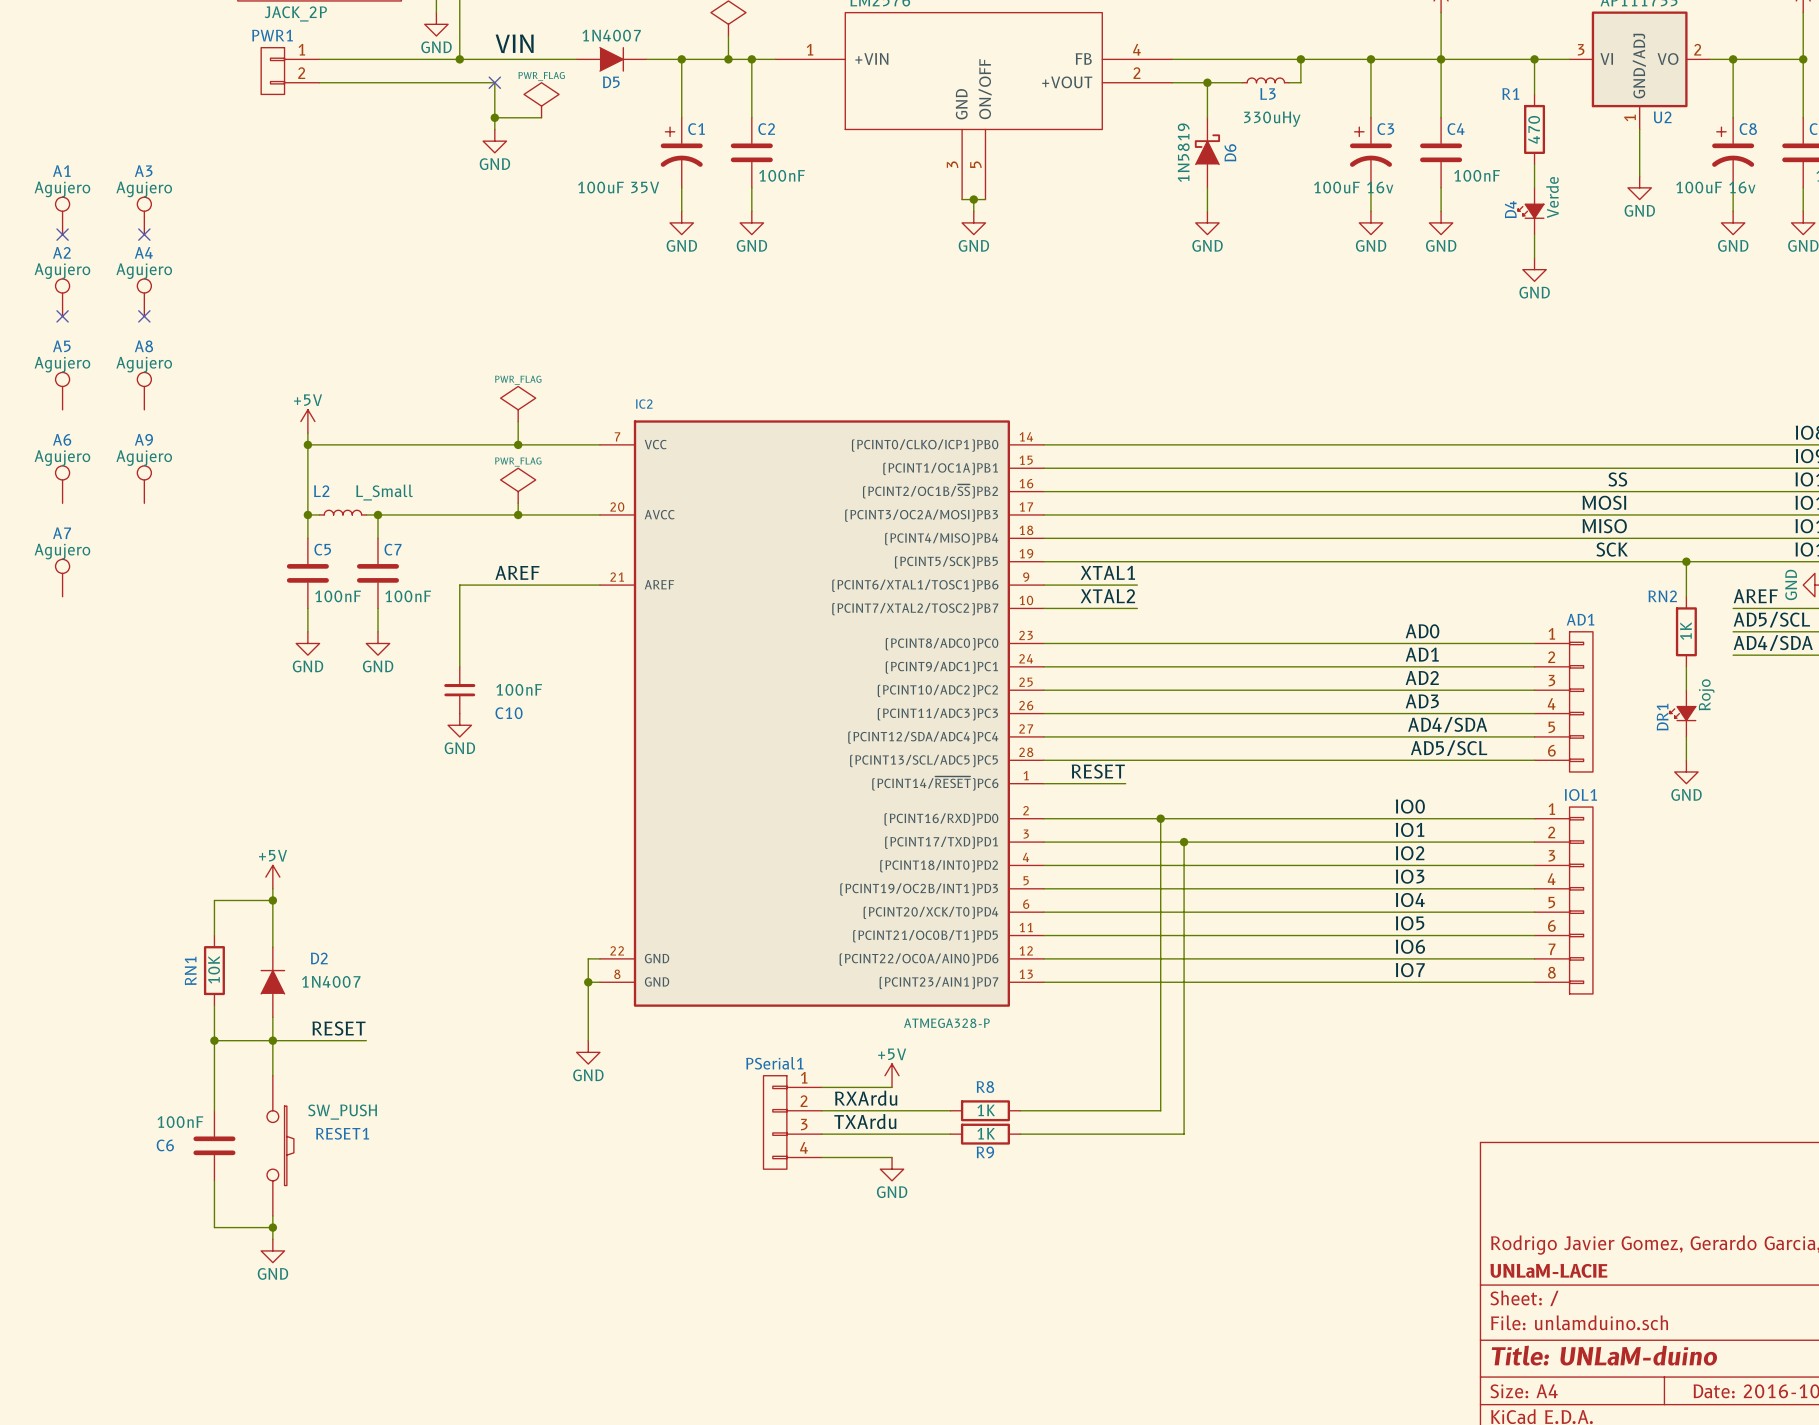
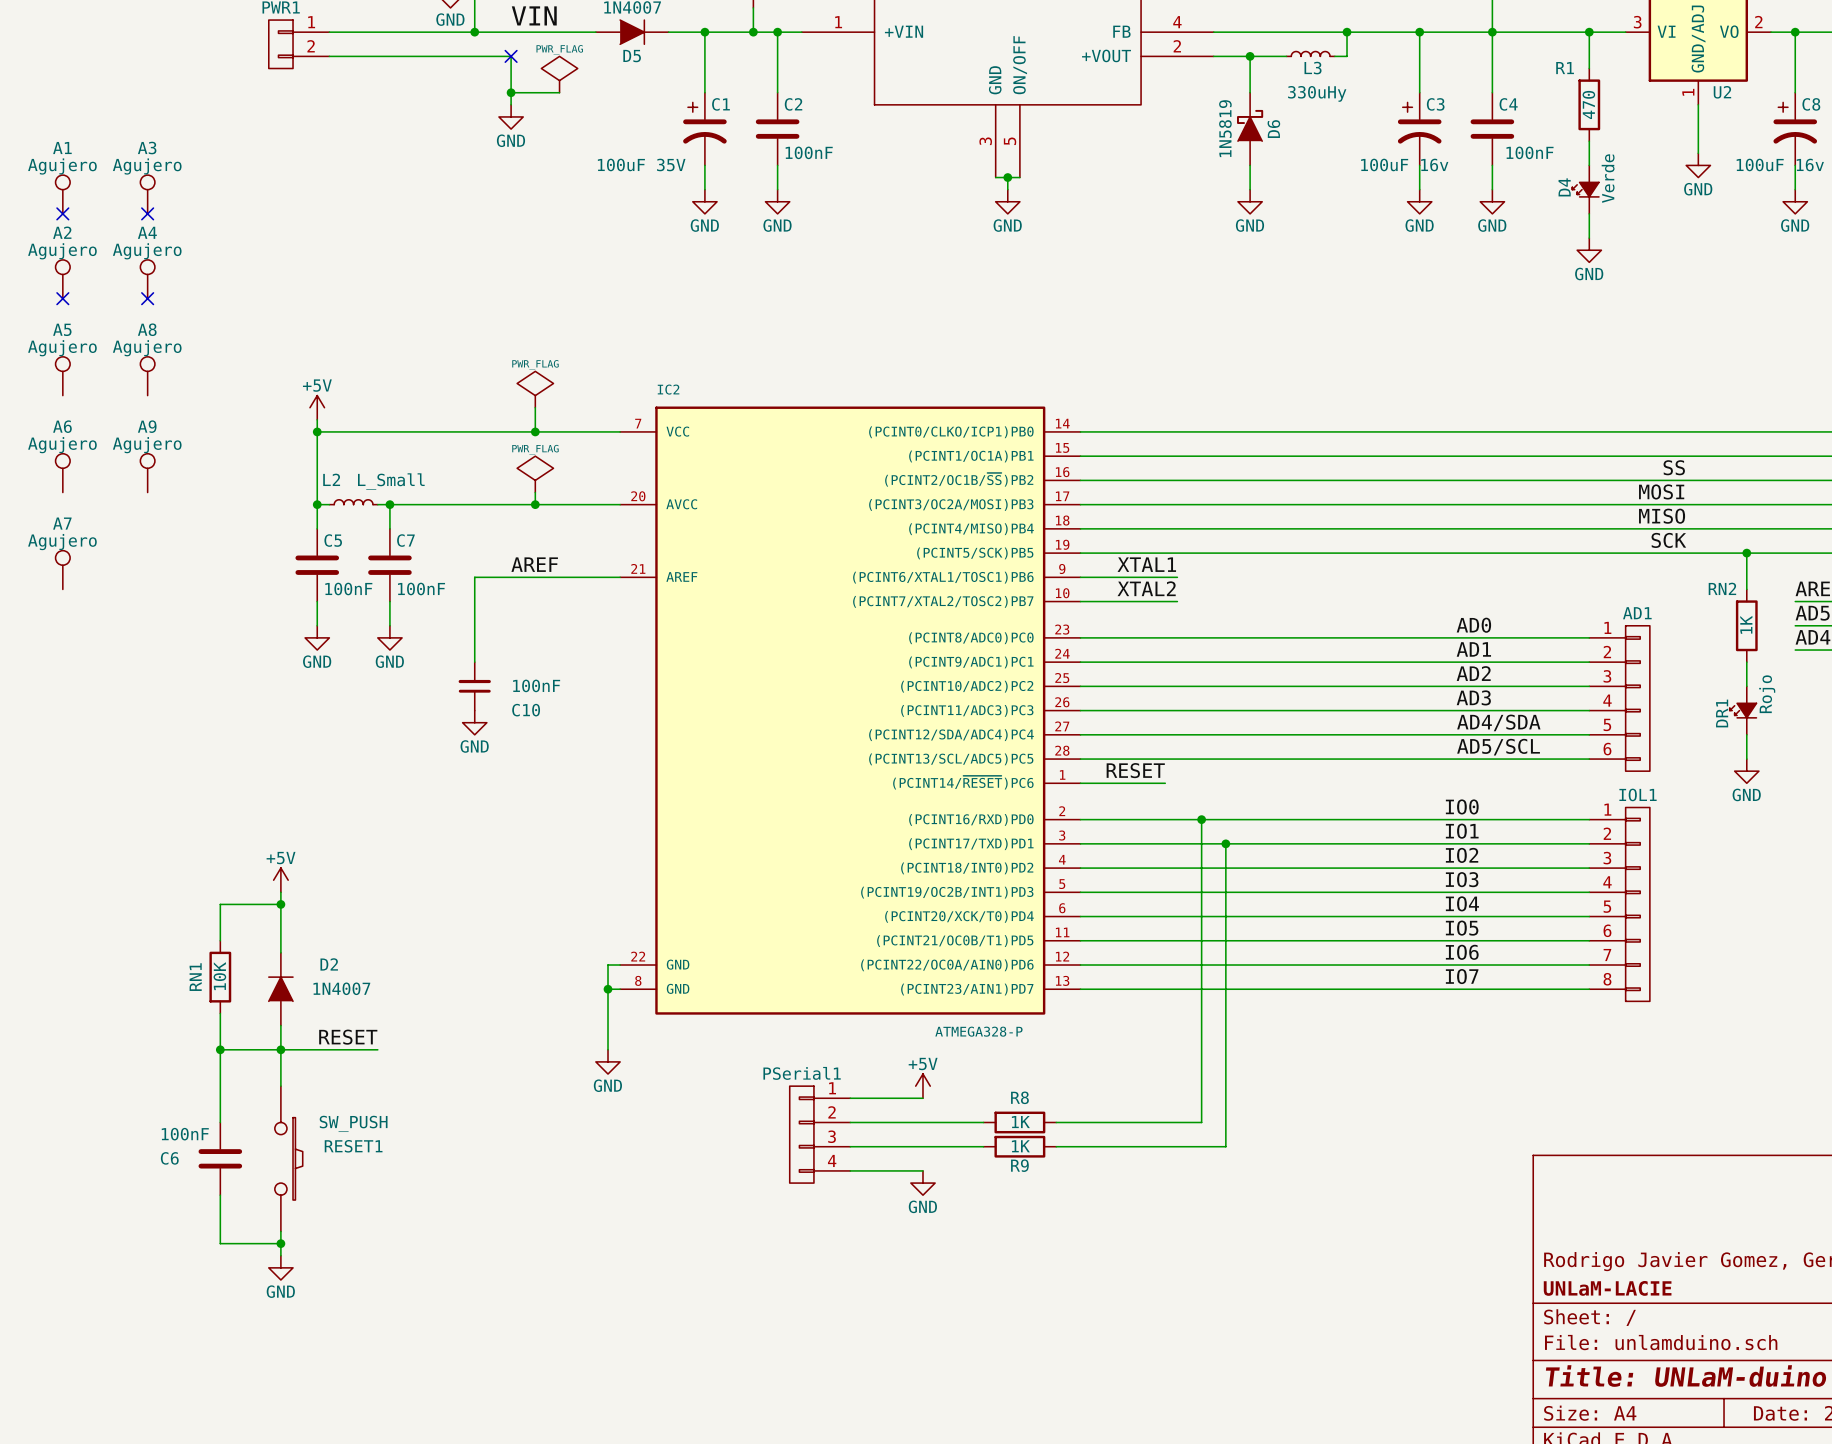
label: RXArdu (866, 1098) -> none
label: TXArdu (865, 1121) -> none

